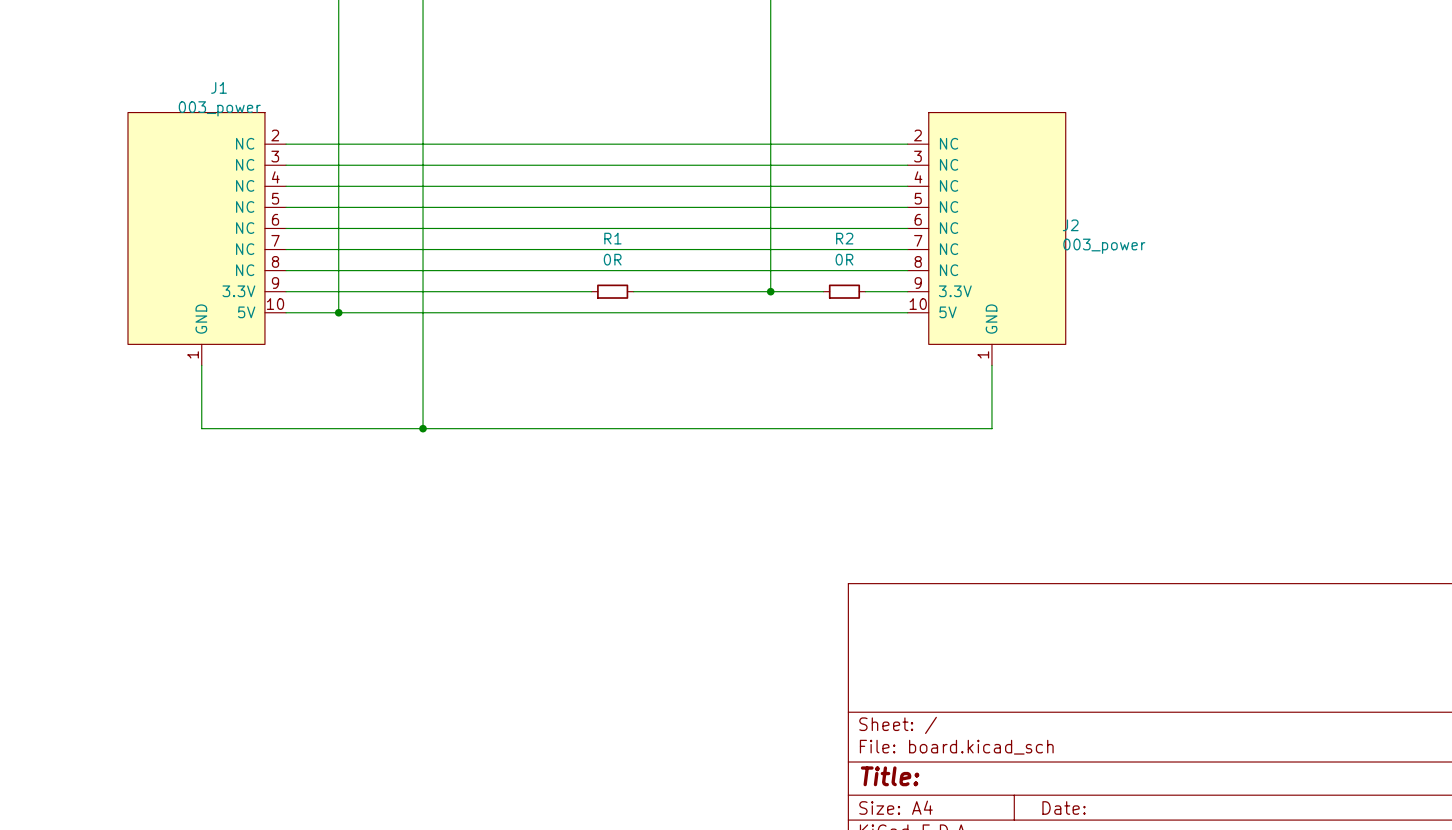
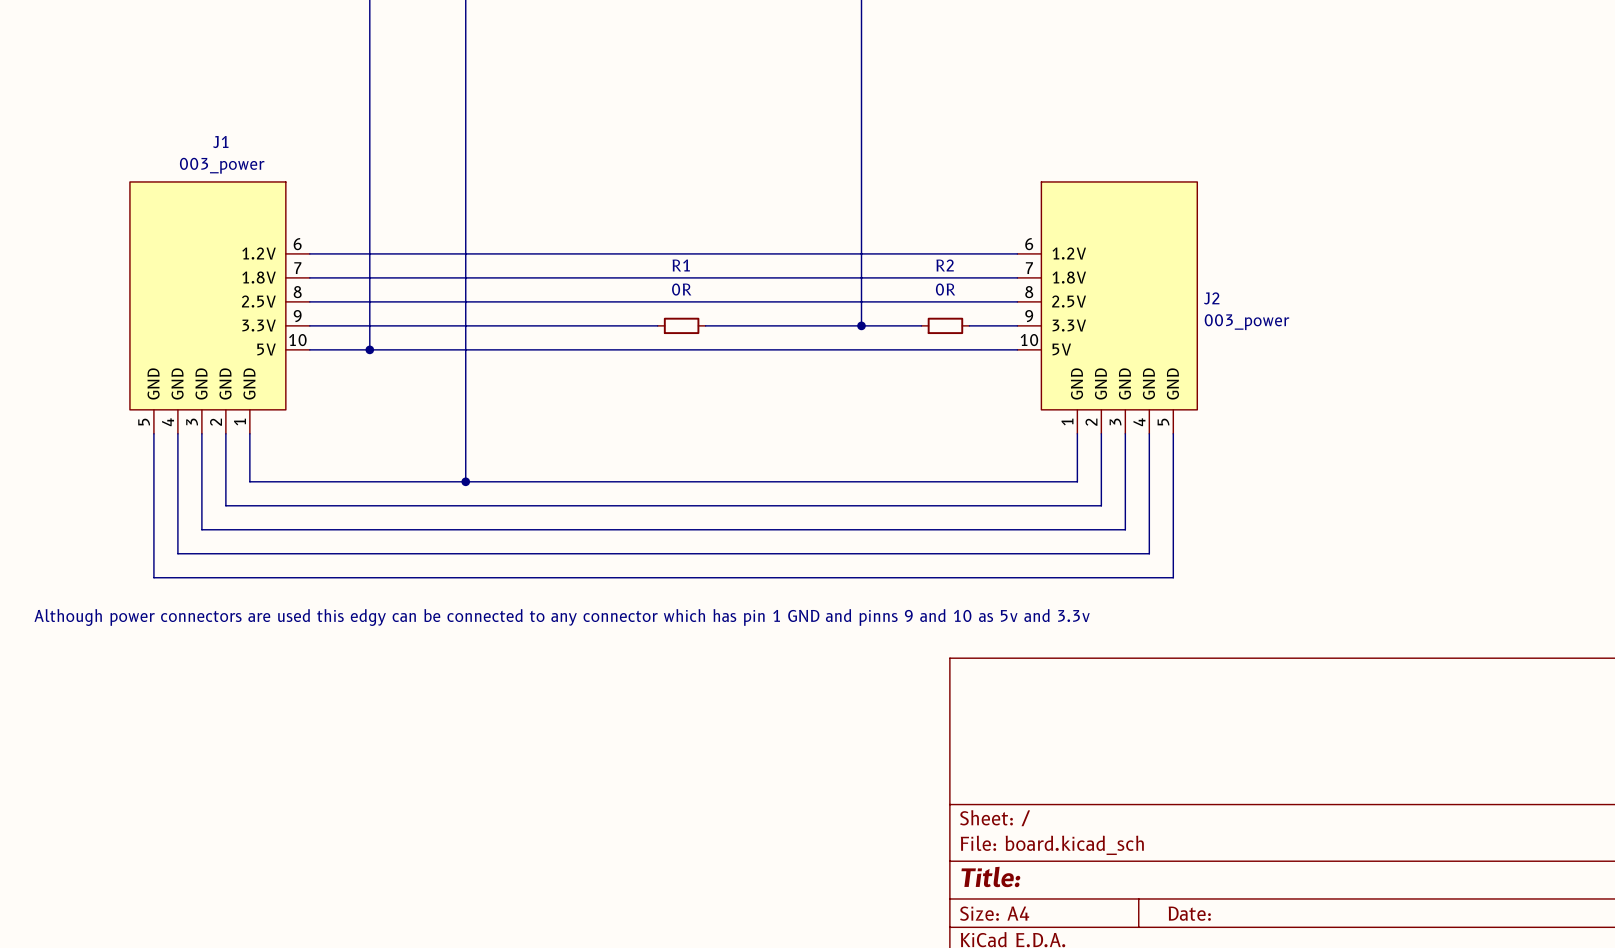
J1 symbol: [127, 112, 287, 366] -> [129, 181, 310, 434]
J2 symbol: [907, 112, 1066, 366] -> [1017, 181, 1198, 434]
wire: (286, 144) (907, 144) -> none
wire: (286, 165) (907, 165) -> none
wire: (286, 186) (907, 186) -> none
wire: (286, 207) (907, 207) -> none
wire: (201, 365) (201, 428) (233, 428) -> (249, 433) (249, 481)
wire: (991, 365) (991, 428) (960, 428) -> (1077, 433) (1077, 481)
wire: none -> (153, 433) (153, 577) (1173, 577) (1173, 433)
wire: none -> (177, 433) (177, 553) (1149, 553) (1149, 433)
wire: none -> (201, 433) (201, 529) (1125, 529) (1125, 433)
wire: none -> (225, 433) (225, 505) (1101, 505) (1101, 433)
text: none -> Although power connectors are used this edgy can be connected to any connector which has pin 1 GND and pinns 9 and 10 as 5v and 3.3v (562, 617)

